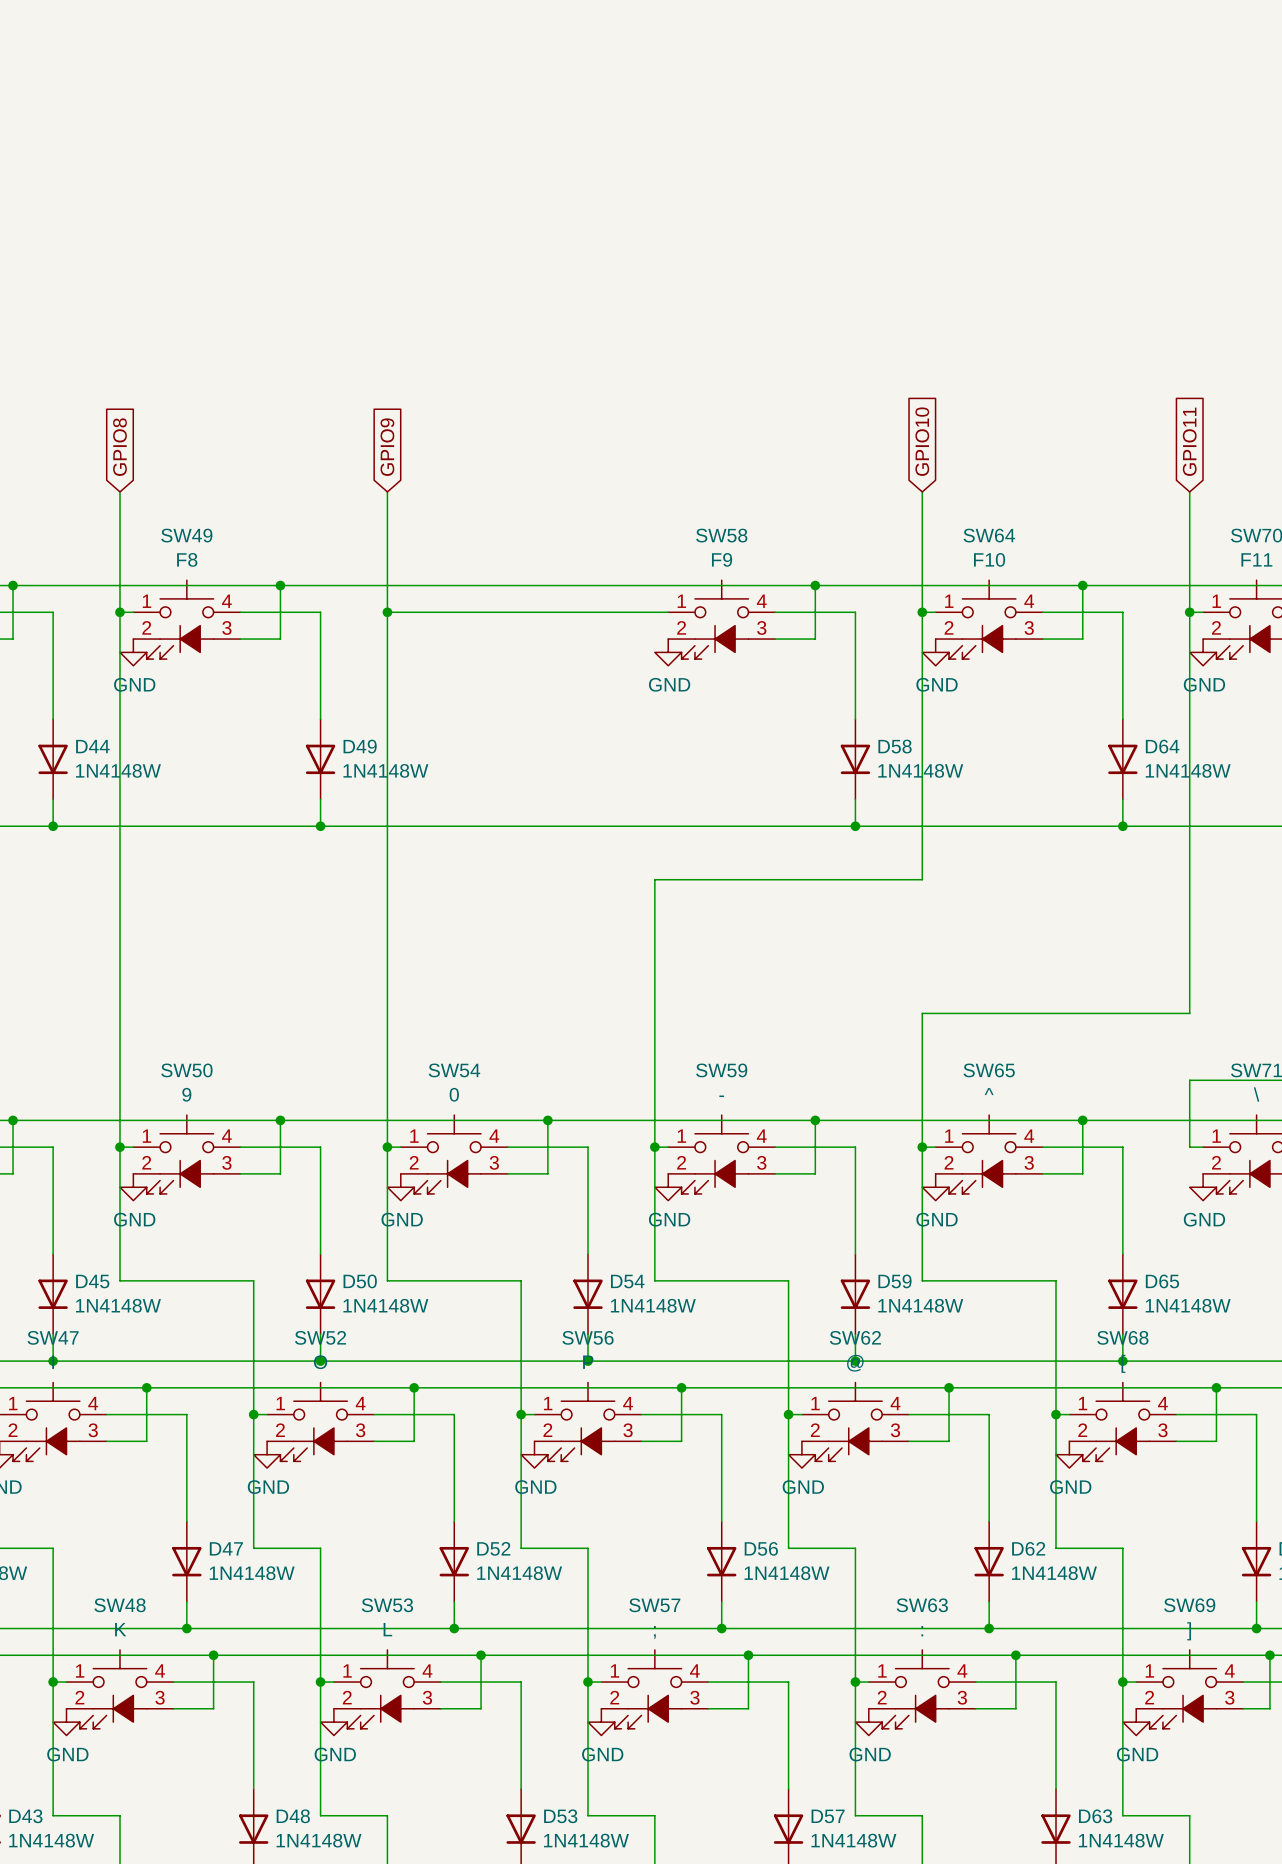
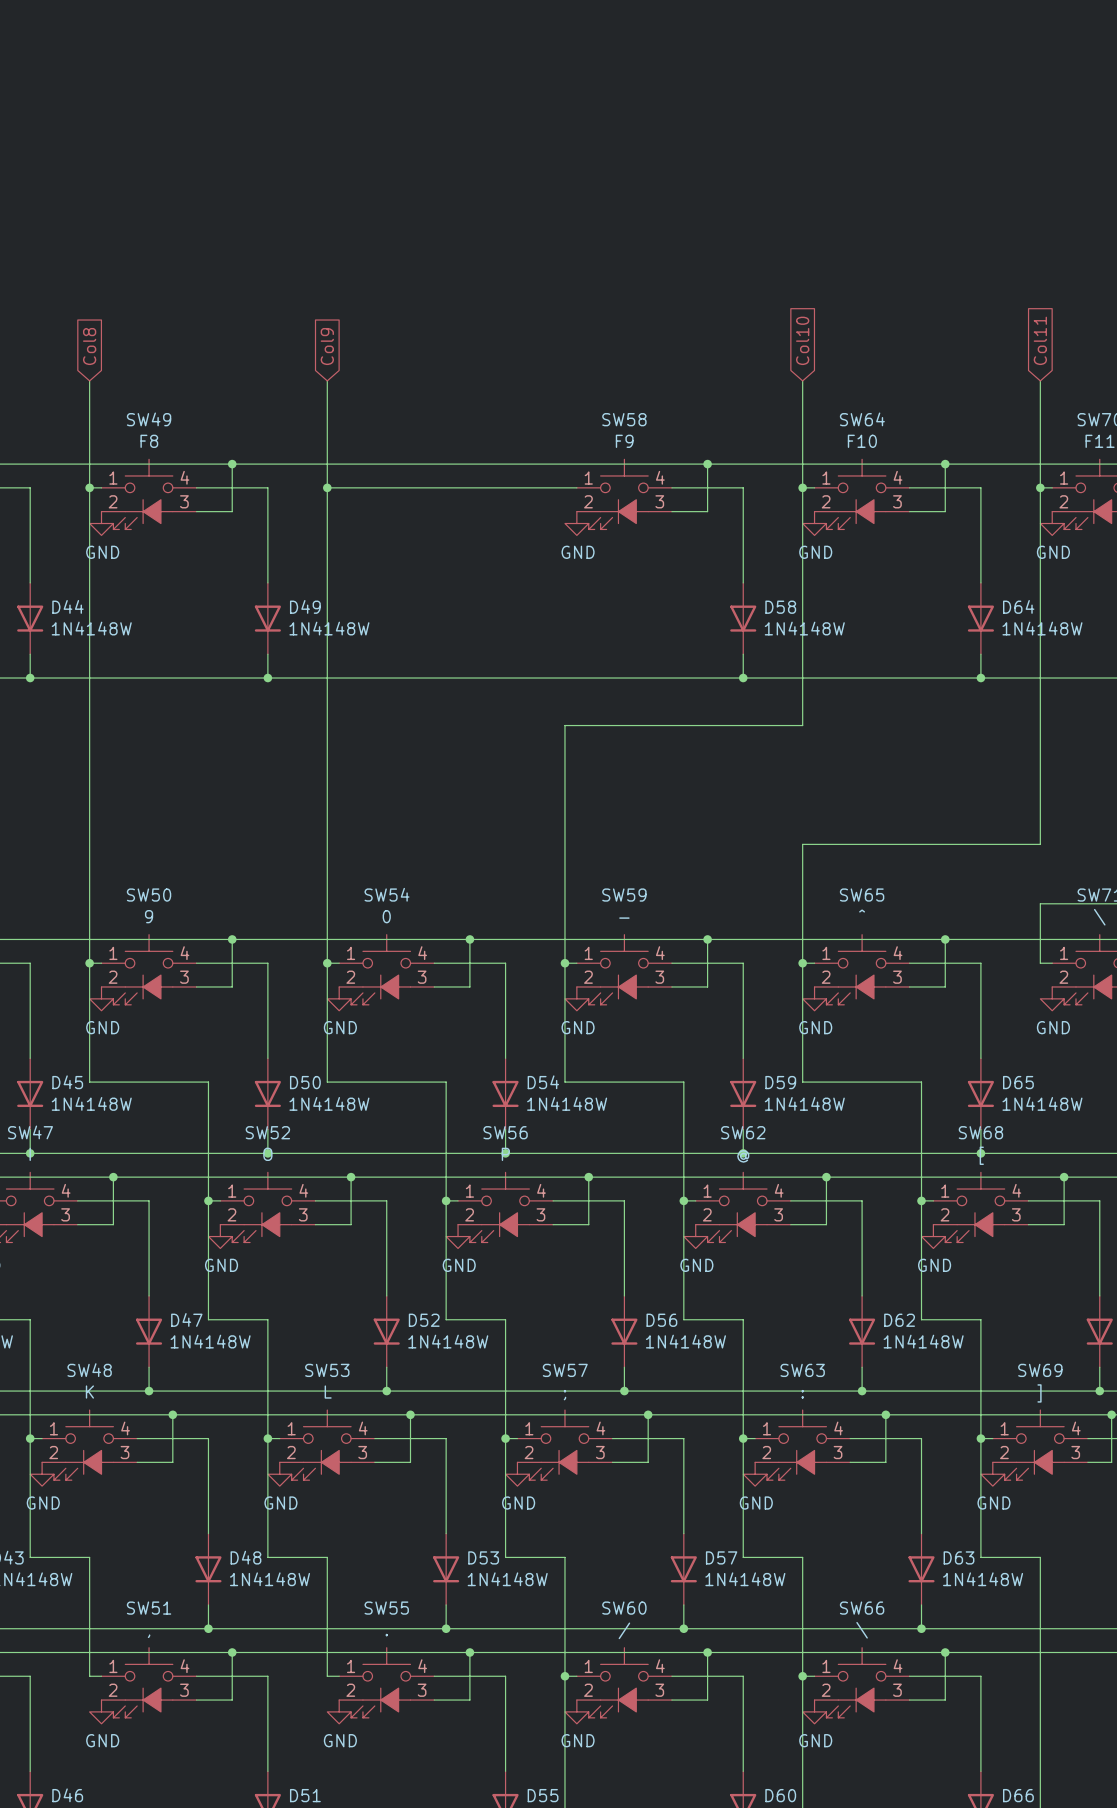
global label: GPIO10 (922, 441) -> Col10 (802, 340)
global label: GPIO11 (1189, 441) -> Col11 (1040, 340)
global label: GPIO8 (119, 447) -> Col8 (89, 346)
global label: GPIO9 (387, 447) -> Col9 (327, 346)

